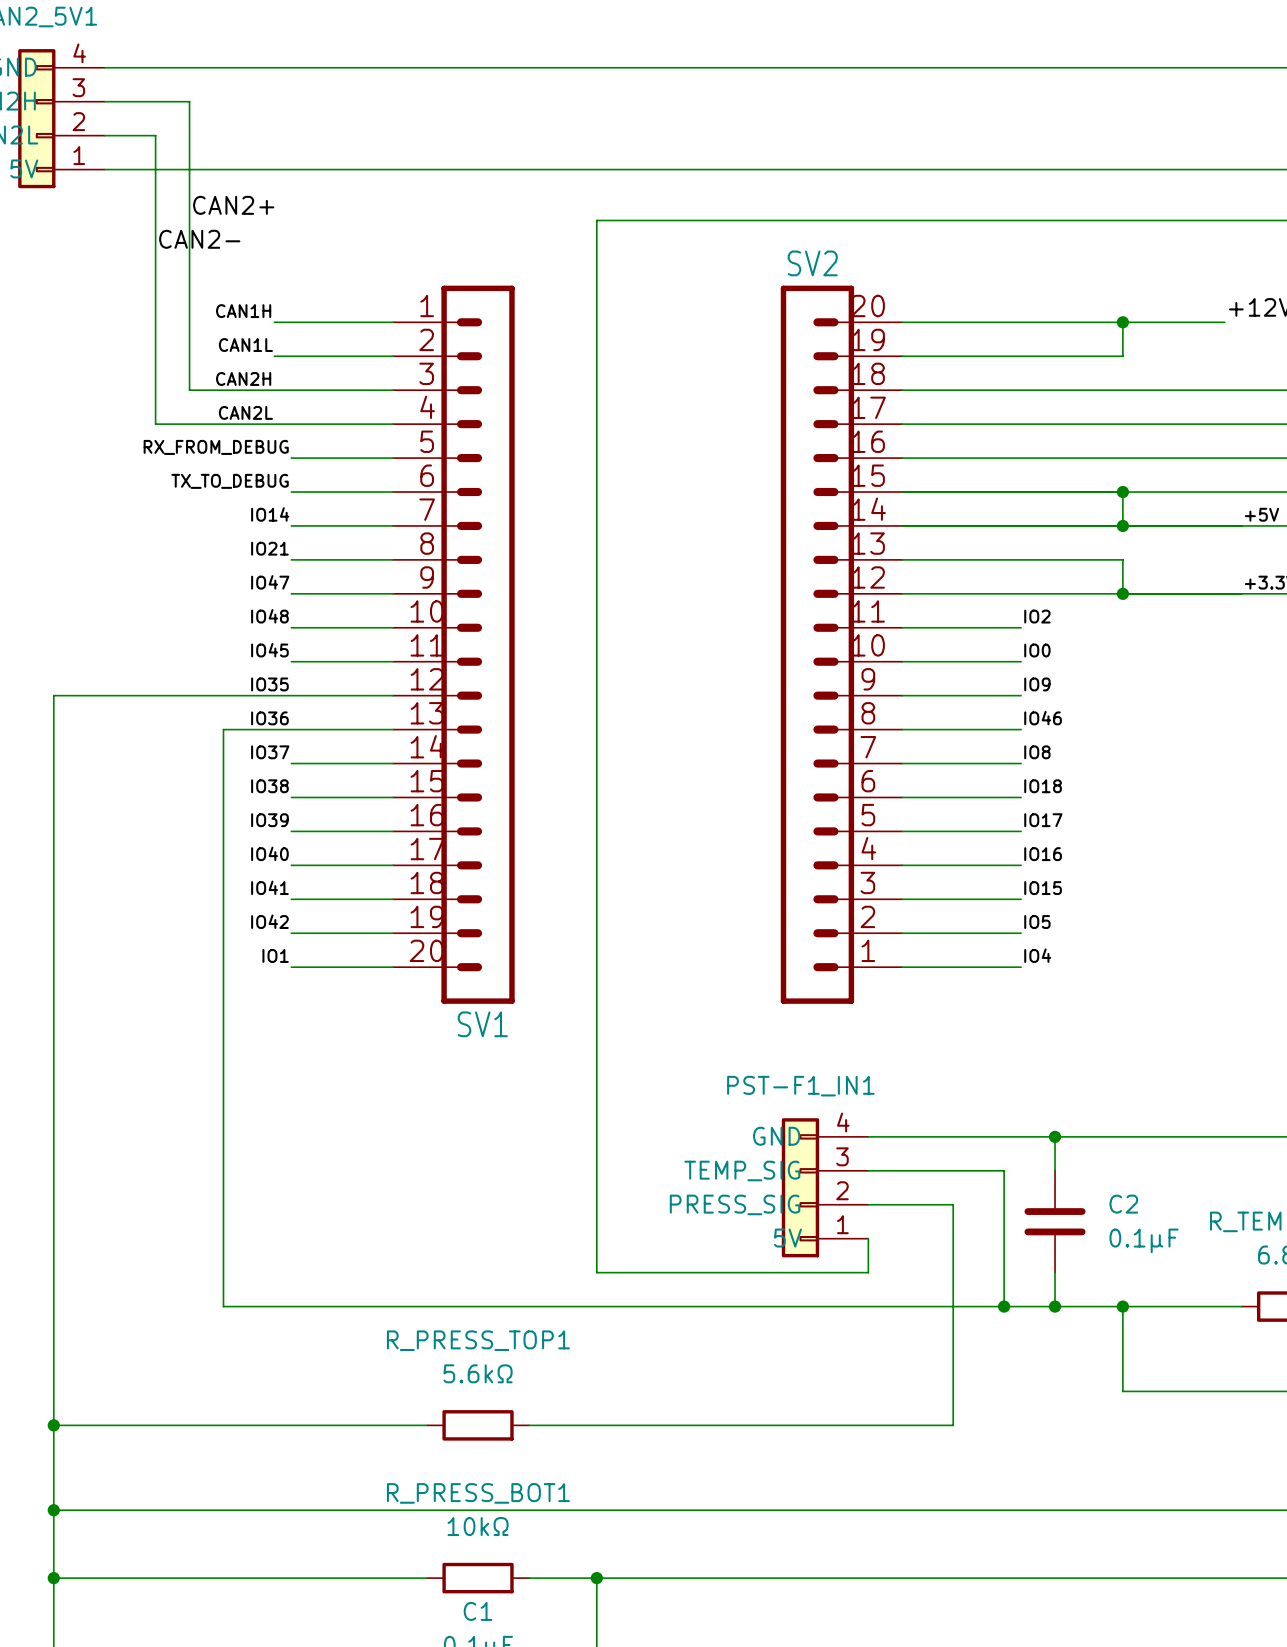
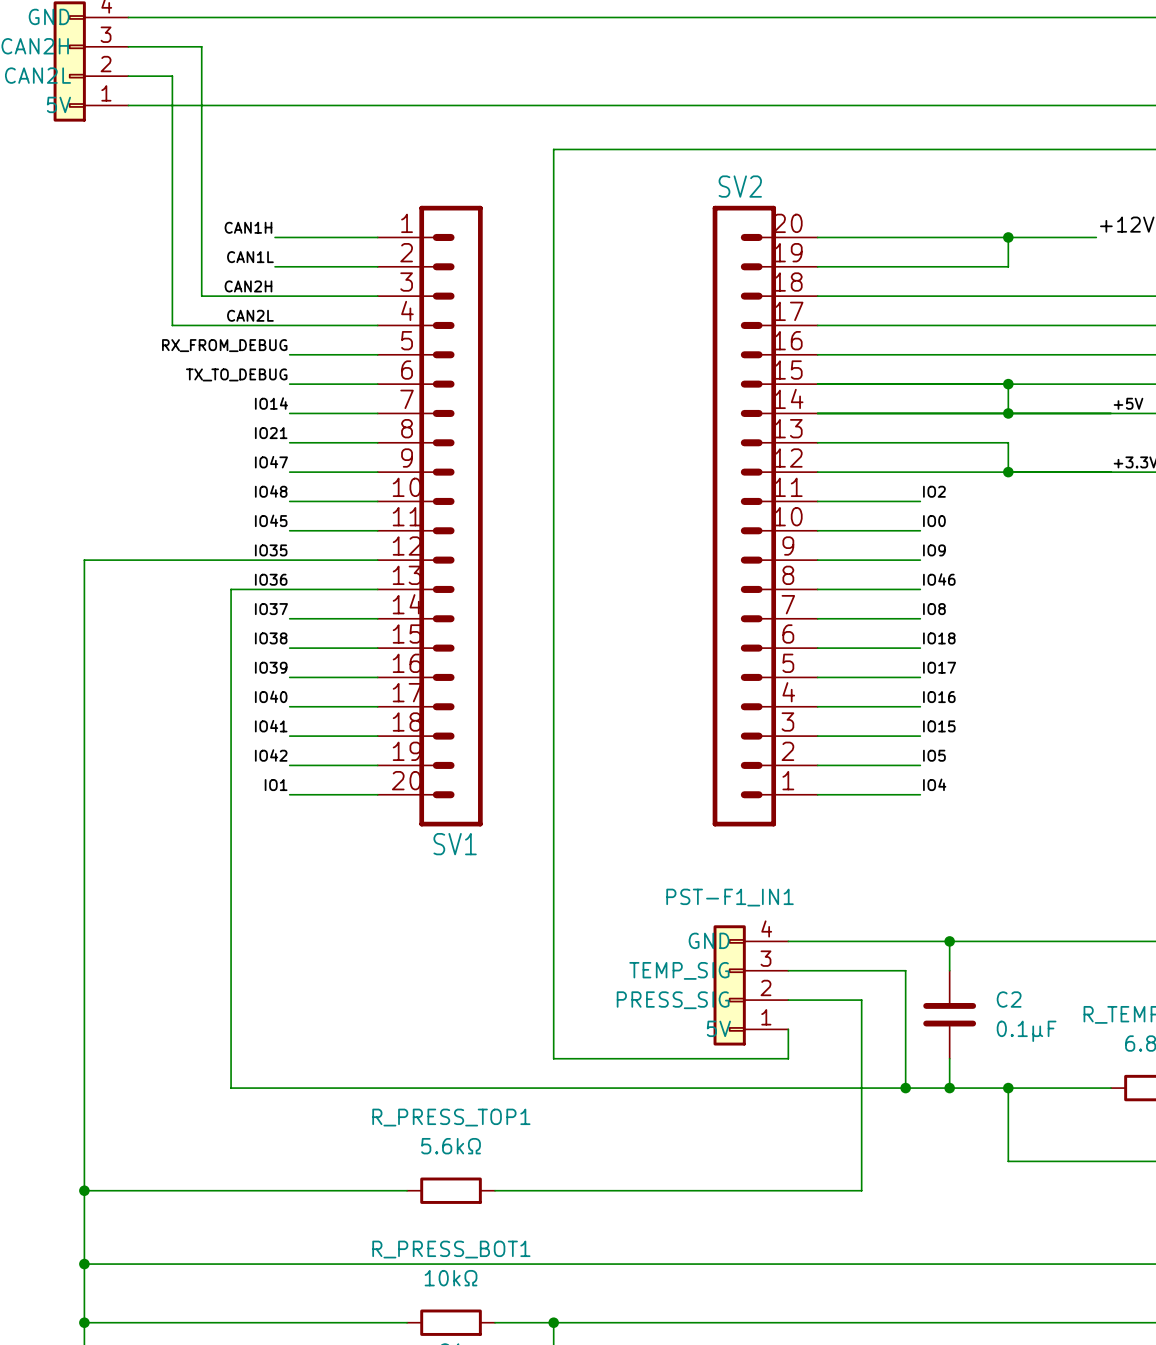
label: CAN2+ (233, 205) -> none
label: CAN2- (199, 239) -> none

